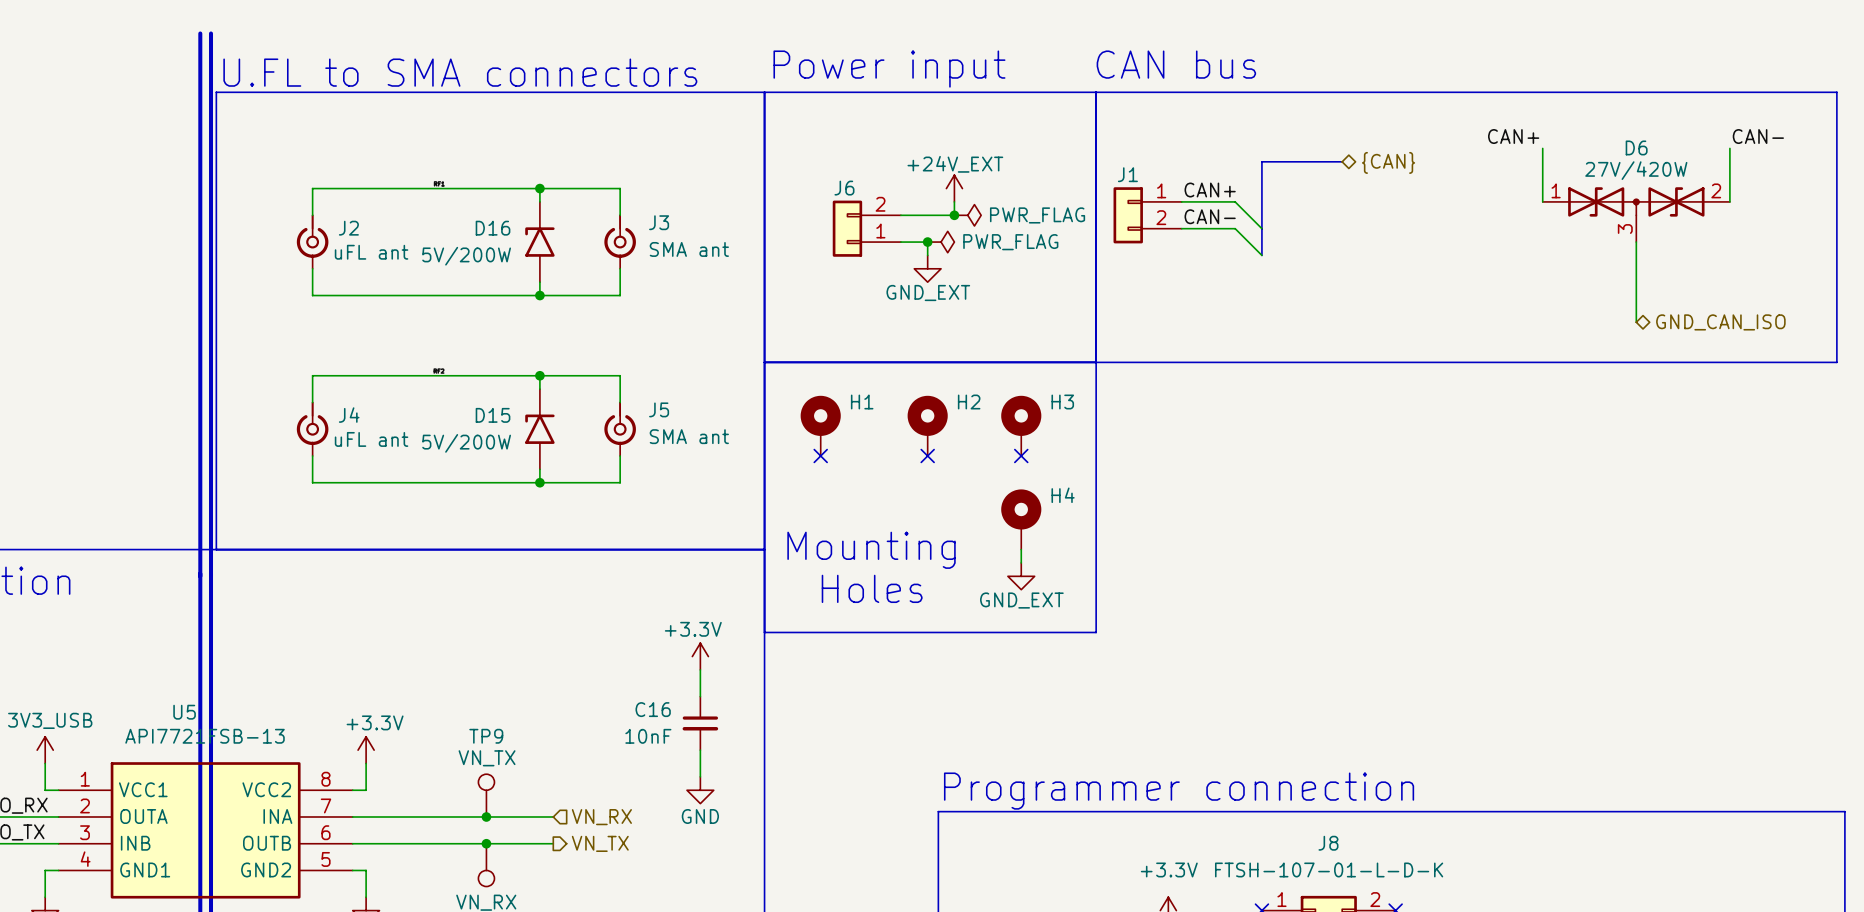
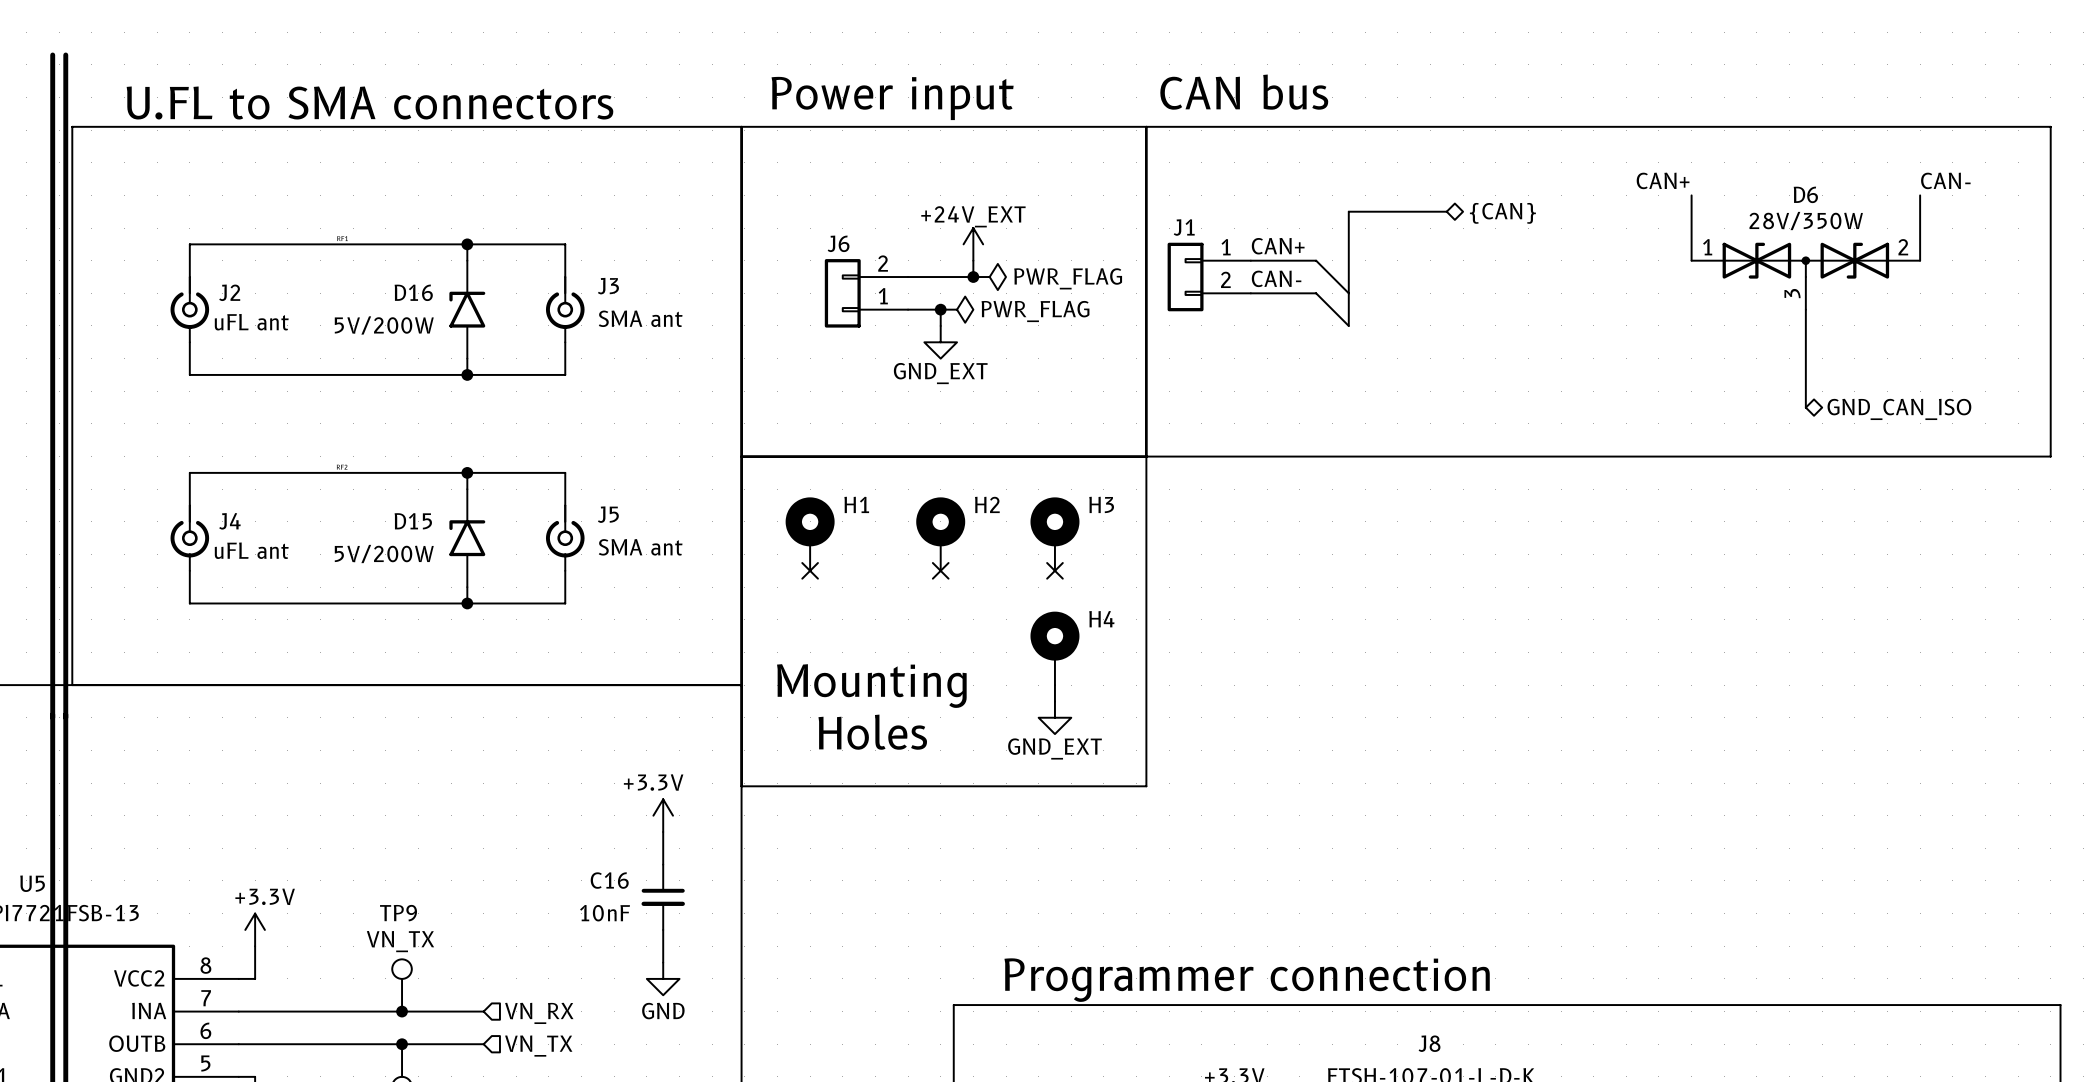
D6 value: 27V/420W (1636, 170) -> 28V/350W (1806, 221)
hierarchical label shape: output (600, 843) -> input (538, 1046)

